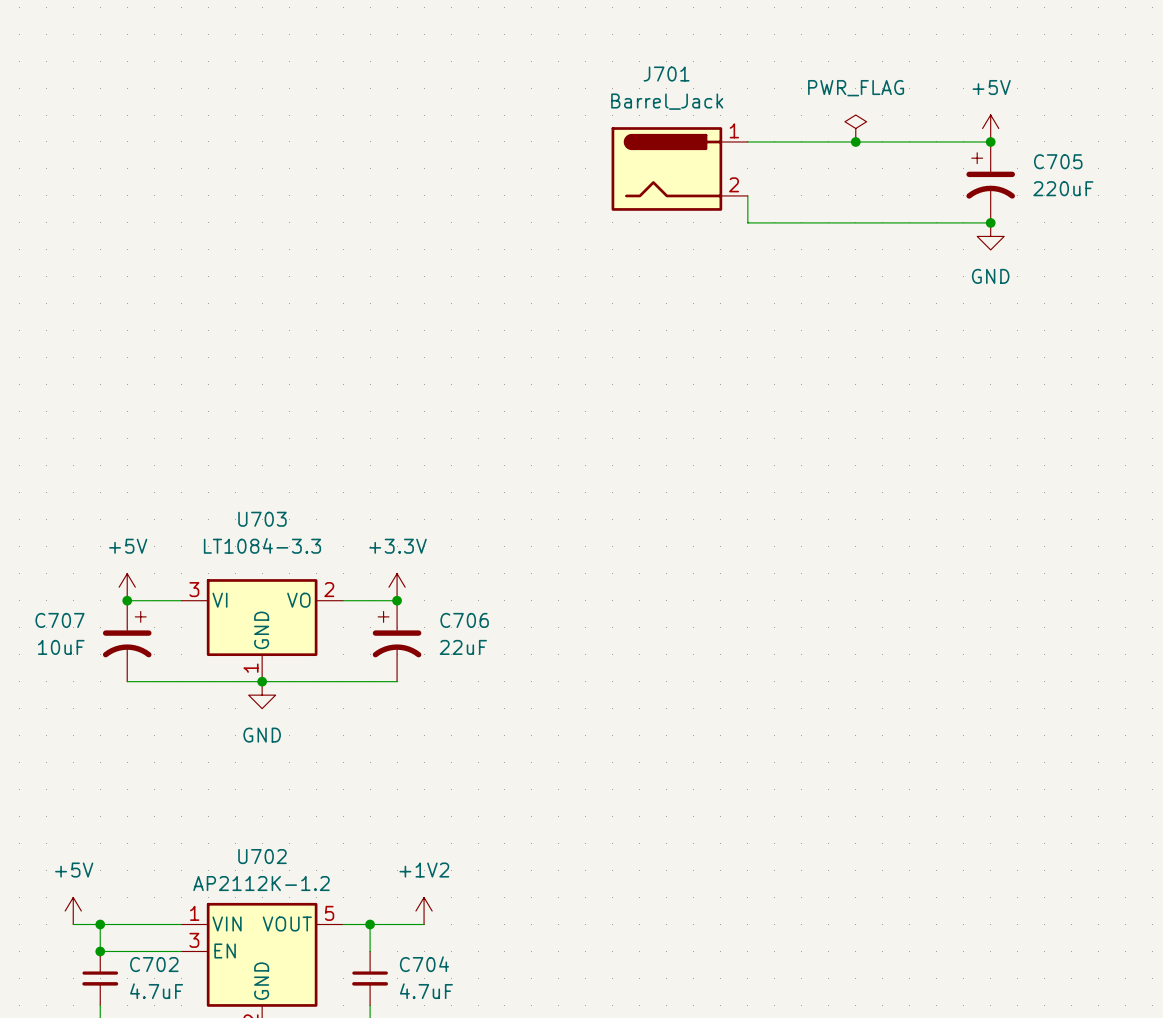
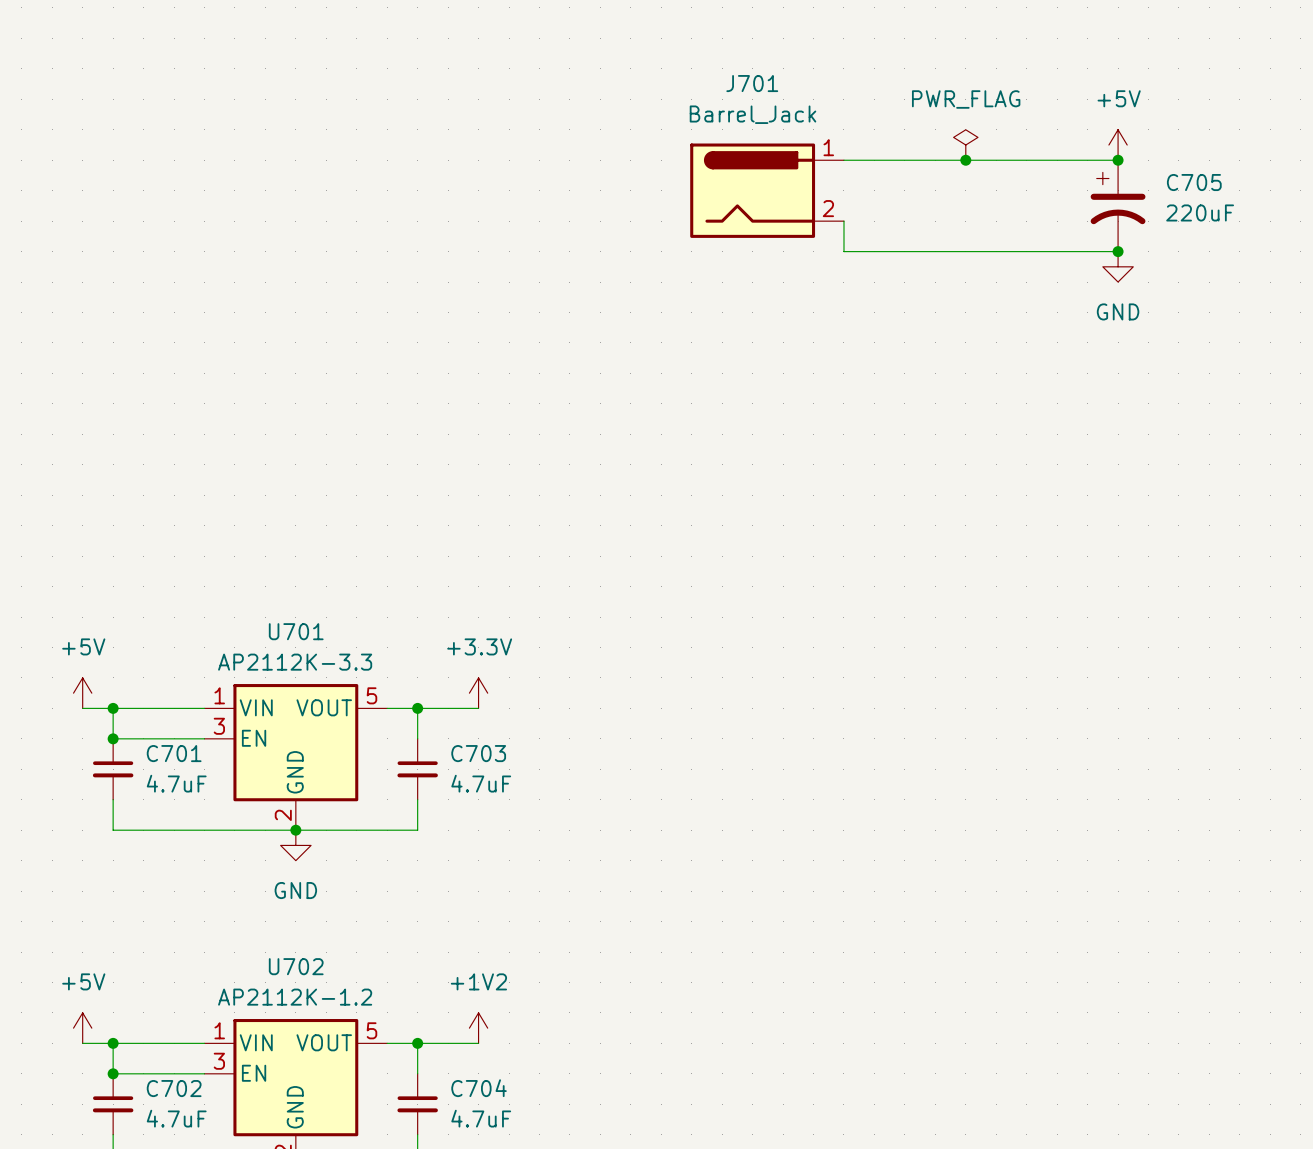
power symbol position: +5V (127, 587) -> +5V (82, 693)
power symbol position: +3.3V (397, 587) -> +3.3V (478, 693)
wire: (127, 600) (181, 600) -> none
junction: (127, 600) -> none
wire: (343, 600) (397, 600) -> none
junction position: (397, 600) -> (417, 708)
wire: none -> (82, 708) (204, 708)
wire: none -> (113, 708) (113, 738) (204, 738)
junction: none -> (113, 708)
wire: none -> (387, 708) (478, 708)
wire: none -> (417, 708) (417, 738)
U703: LT1084-3.3 (262, 630) -> none
C707: 10uF (127, 641) -> none
C706: 22uF (397, 641) -> none
junction: none -> (113, 738)
U701: none -> AP2112K-3.3 (295, 757)
C701: none -> 4.7uF (113, 769)
wire: (127, 681) (397, 681) -> none
junction position: (262, 681) -> (295, 830)
C703: none -> 4.7uF (417, 769)
power symbol position: GND (262, 695) -> GND (295, 845)
wire: none -> (113, 799) (113, 830) (417, 830) (417, 799)

